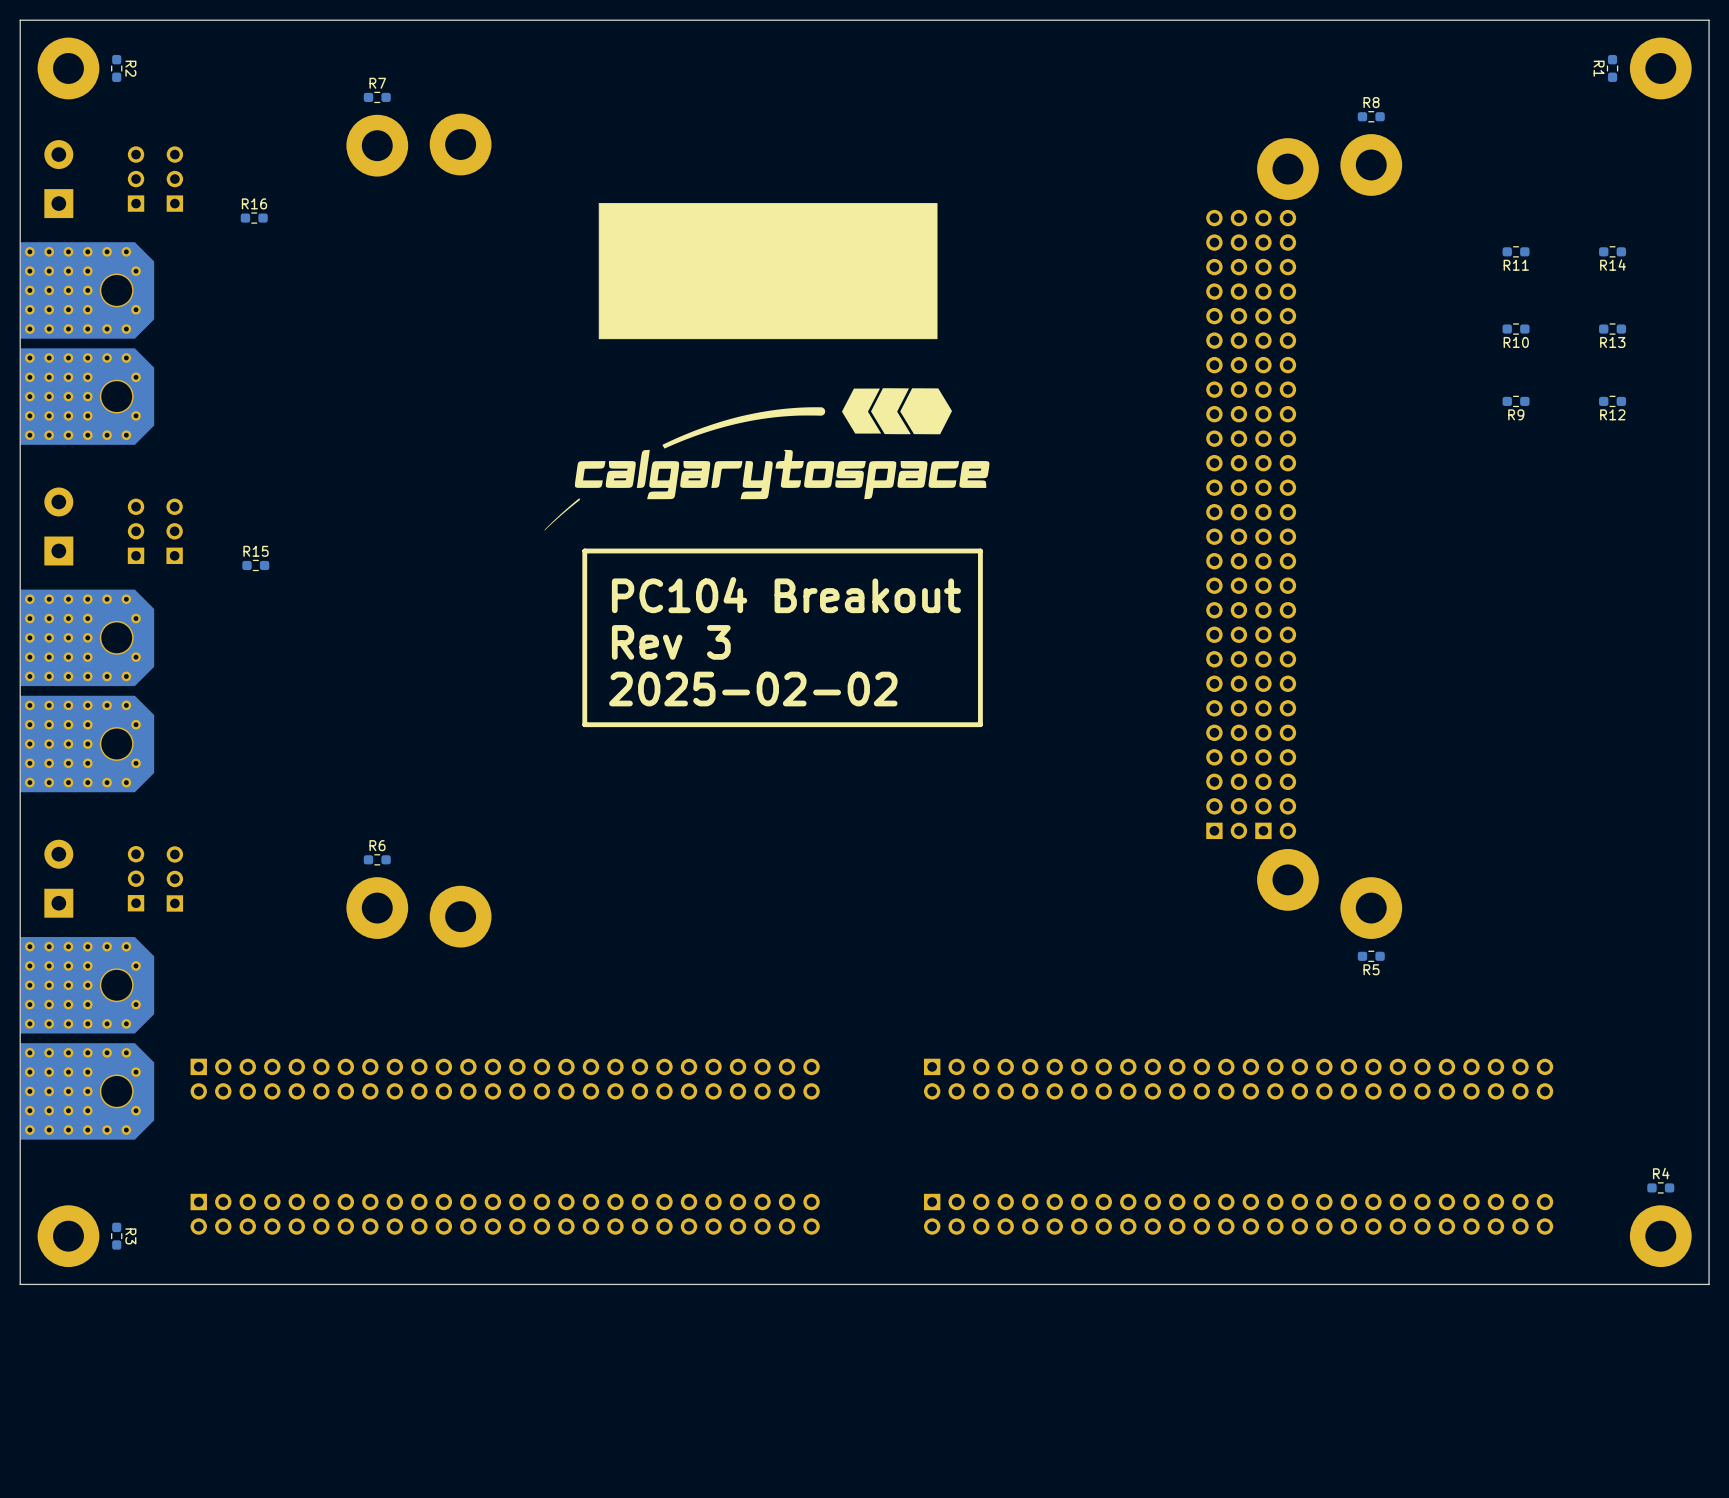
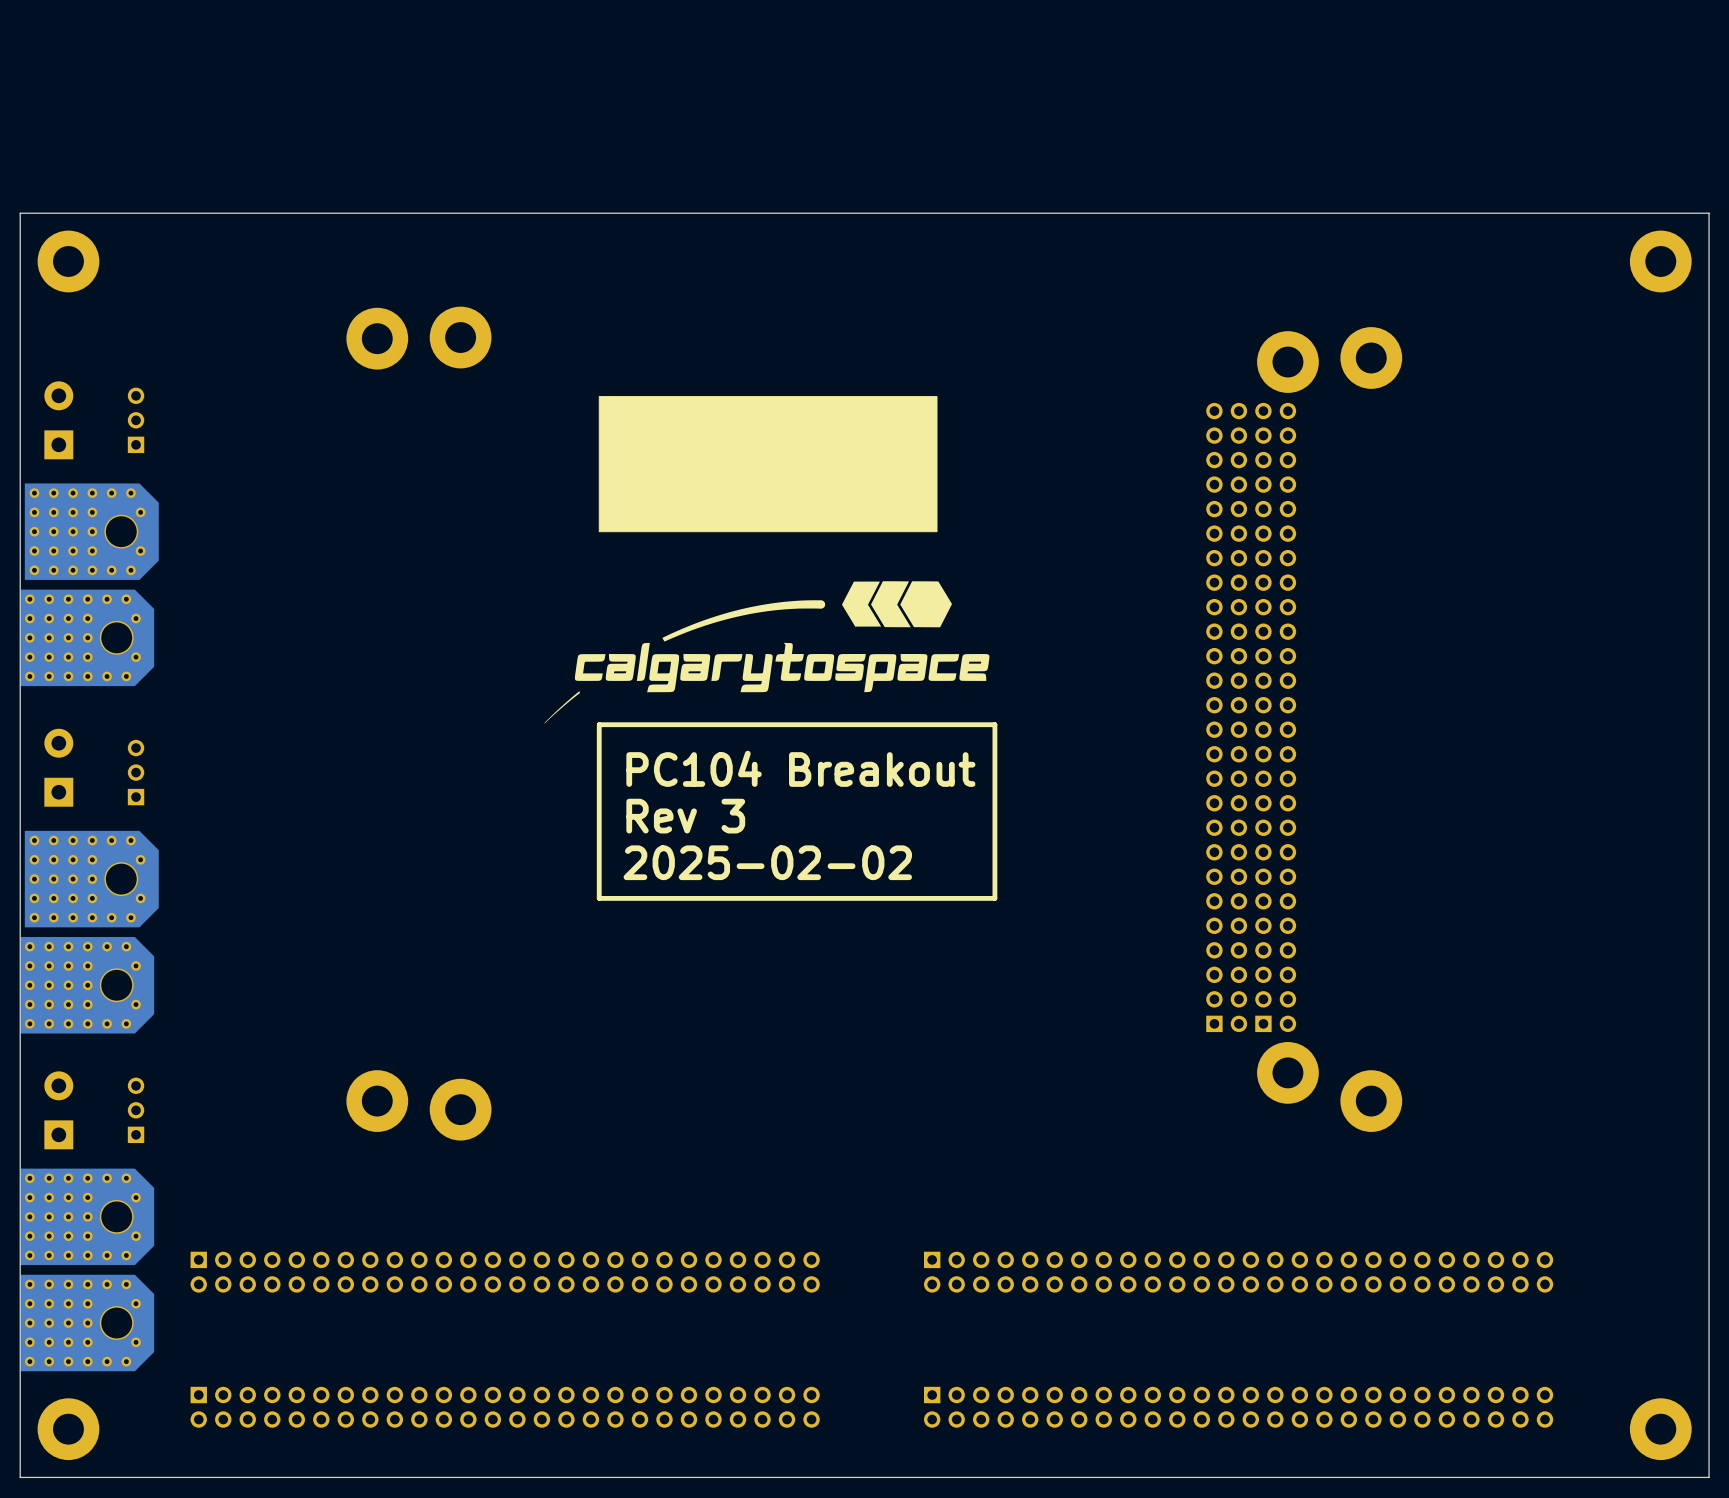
part: (68, 68) -> none
R2: (116, 68) -> none
R1: (1612, 68) -> none
part: (1660, 68) -> none
R7: (377, 97) -> none
R8: (1371, 116) -> none
part: (460, 144) -> none
part: (377, 145) -> none
part: (1371, 164) -> none
part: (1287, 169) -> none
part: (58, 179) -> none
part: (136, 179) -> none
part: (174, 179) -> none
board edge: (1709, 213) (1709, 20) (20, 20) (20, 213) -> (1709, 213) (20, 213)
R16: (254, 218) -> none
R11: (1516, 251) -> none
R14: (1612, 251) -> none
part: none -> (68, 261)
part: none -> (1660, 261)
drawing position: (768, 271) -> (768, 464)
part: (87, 290) -> none
R10: (1516, 329) -> none
R13: (1612, 329) -> none
part: none -> (460, 337)
part: none -> (377, 338)
part: none -> (1371, 357)
part: none -> (1287, 362)
part: (87, 396) -> none
R9: (1516, 401) -> none
R12: (1612, 401) -> none
part: none -> (136, 420)
drawing position: (766, 459) -> (766, 652)
part: (1226, 524) -> none
part: (1275, 524) -> none
part position: (58, 526) -> (58, 420)
part: none -> (91, 531)
part: (136, 531) -> none
part: (174, 531) -> none
R15: (255, 565) -> none
text position: PC104 Breakout (786, 595) -> PC104 Breakout (800, 768)
text position: Rev 3 (671, 642) -> Rev 3 (685, 816)
text position: 2025-02-02 (753, 689) -> 2025-02-02 (767, 862)
part: none -> (1226, 717)
part: none -> (1275, 717)
line: (980, 724) (980, 550) (584, 550) (584, 724) (599, 724) -> (980, 724) (994, 724) (994, 898) (599, 898) (599, 724)
part: (87, 744) -> none
part: none -> (136, 772)
R6: (377, 859) -> none
part position: (58, 878) -> (58, 767)
part: (136, 878) -> none
part: (174, 878) -> none
part: none -> (91, 879)
part: (1287, 879) -> none
part: (377, 908) -> none
part: (1371, 908) -> none
part: (460, 916) -> none
R5: (1371, 956) -> none
part: none -> (1287, 1072)
part: (505, 1079) -> none
part: (1238, 1079) -> none
part: (87, 1091) -> none
part: none -> (377, 1101)
part: none -> (1371, 1101)
part: none -> (460, 1109)
part: none -> (58, 1110)
part: none -> (136, 1110)
R4: (1660, 1187) -> none
part position: (505, 1214) -> (505, 1272)
part position: (1238, 1214) -> (1238, 1272)
part: none -> (87, 1216)
part: (68, 1236) -> none
R3: (116, 1236) -> none
part: (1660, 1236) -> none
board edge: (1709, 1284) (20, 1284) -> (1709, 1284) (1709, 1477) (20, 1477) (20, 1284)
part: none -> (87, 1323)
part: none -> (505, 1407)
part: none -> (1238, 1407)
part: none -> (68, 1429)
part: none -> (1660, 1429)

